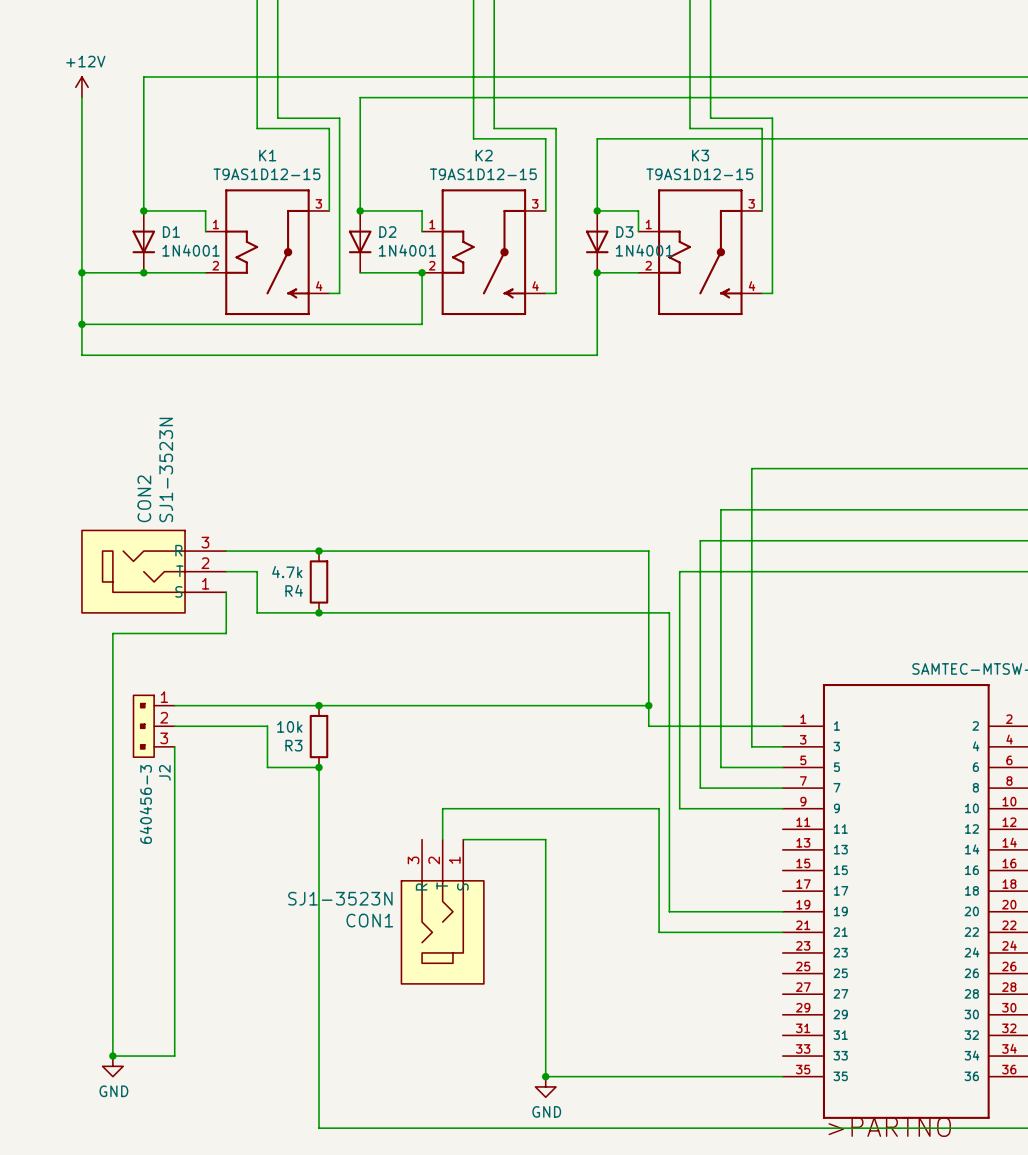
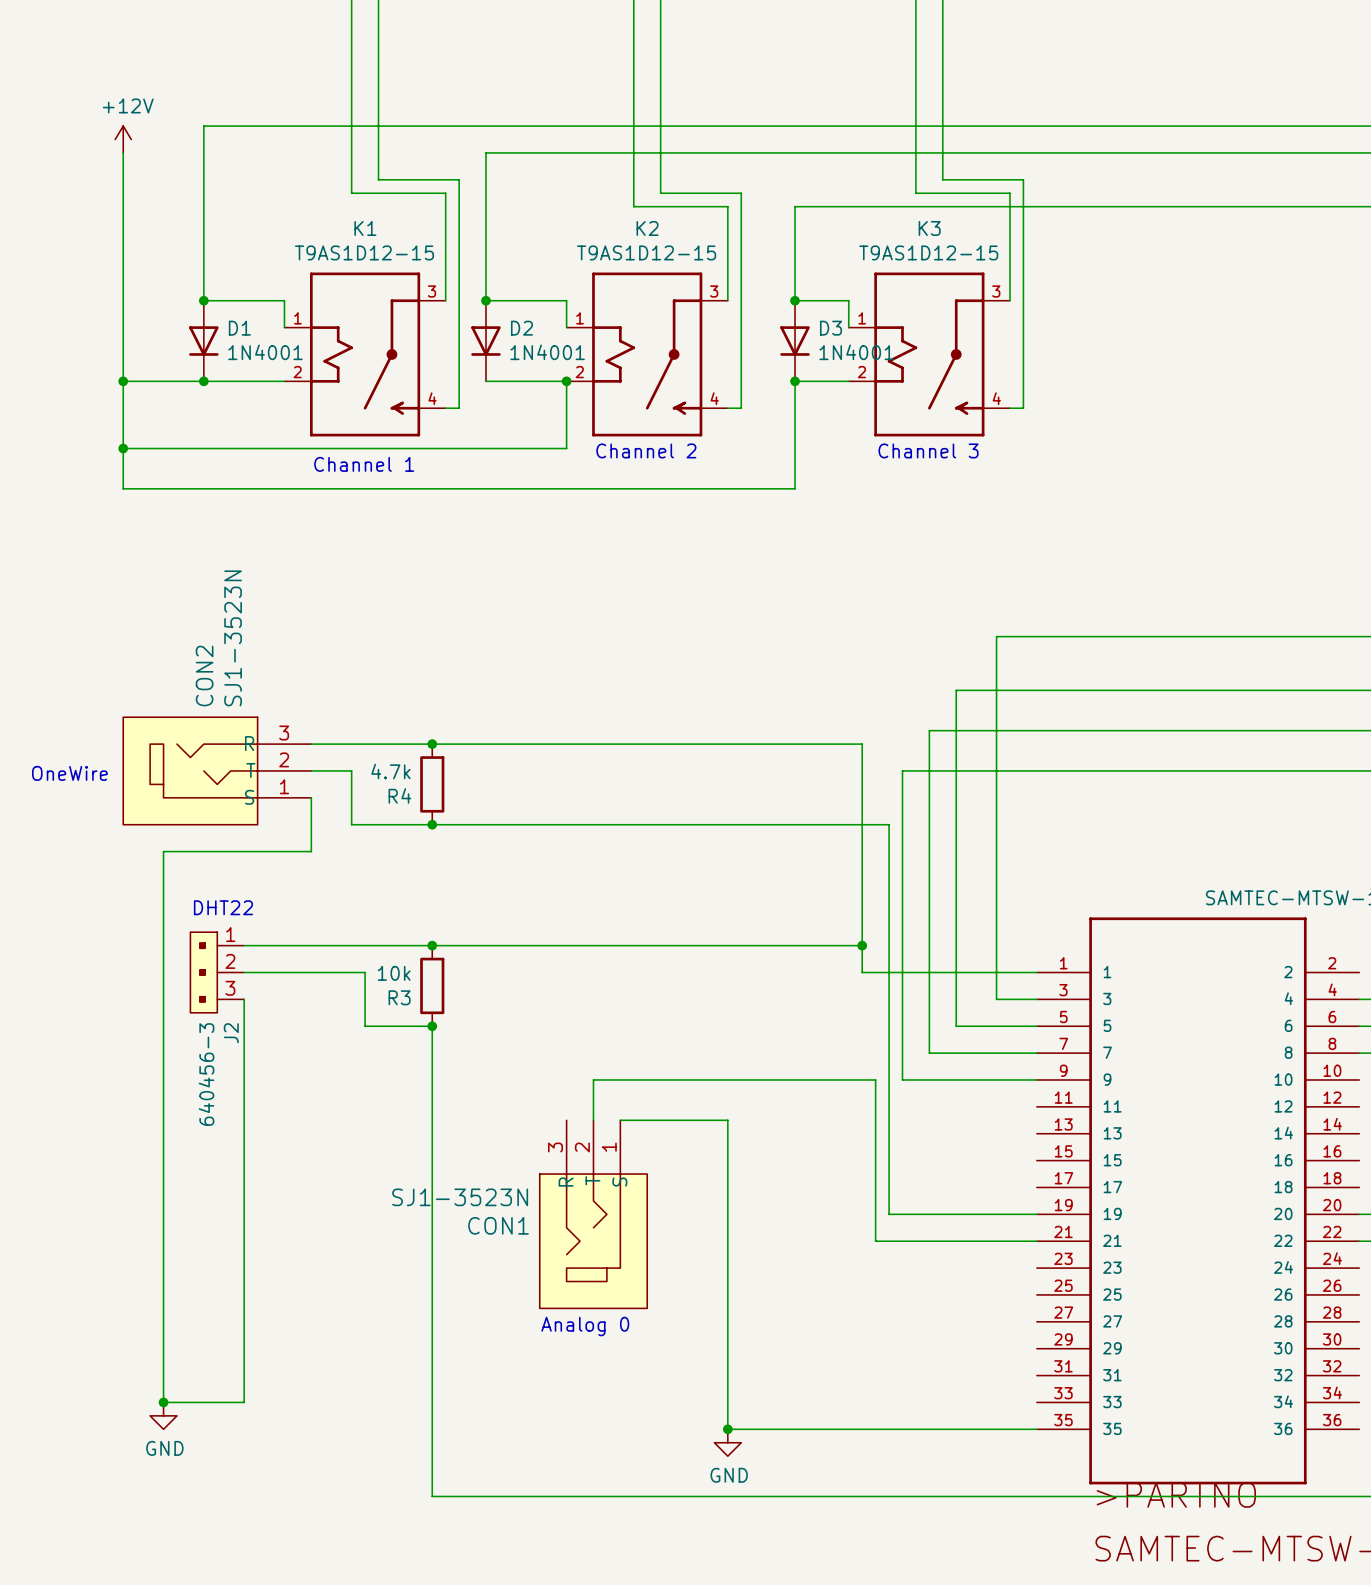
text: none -> Channel 2 (646, 450)
text: none -> Channel 3 (928, 450)
text: none -> Channel 1 (364, 464)
text: none -> OneWire (69, 773)
text: none -> DHT22 (223, 907)
text: none -> Analog 0 (585, 1326)

